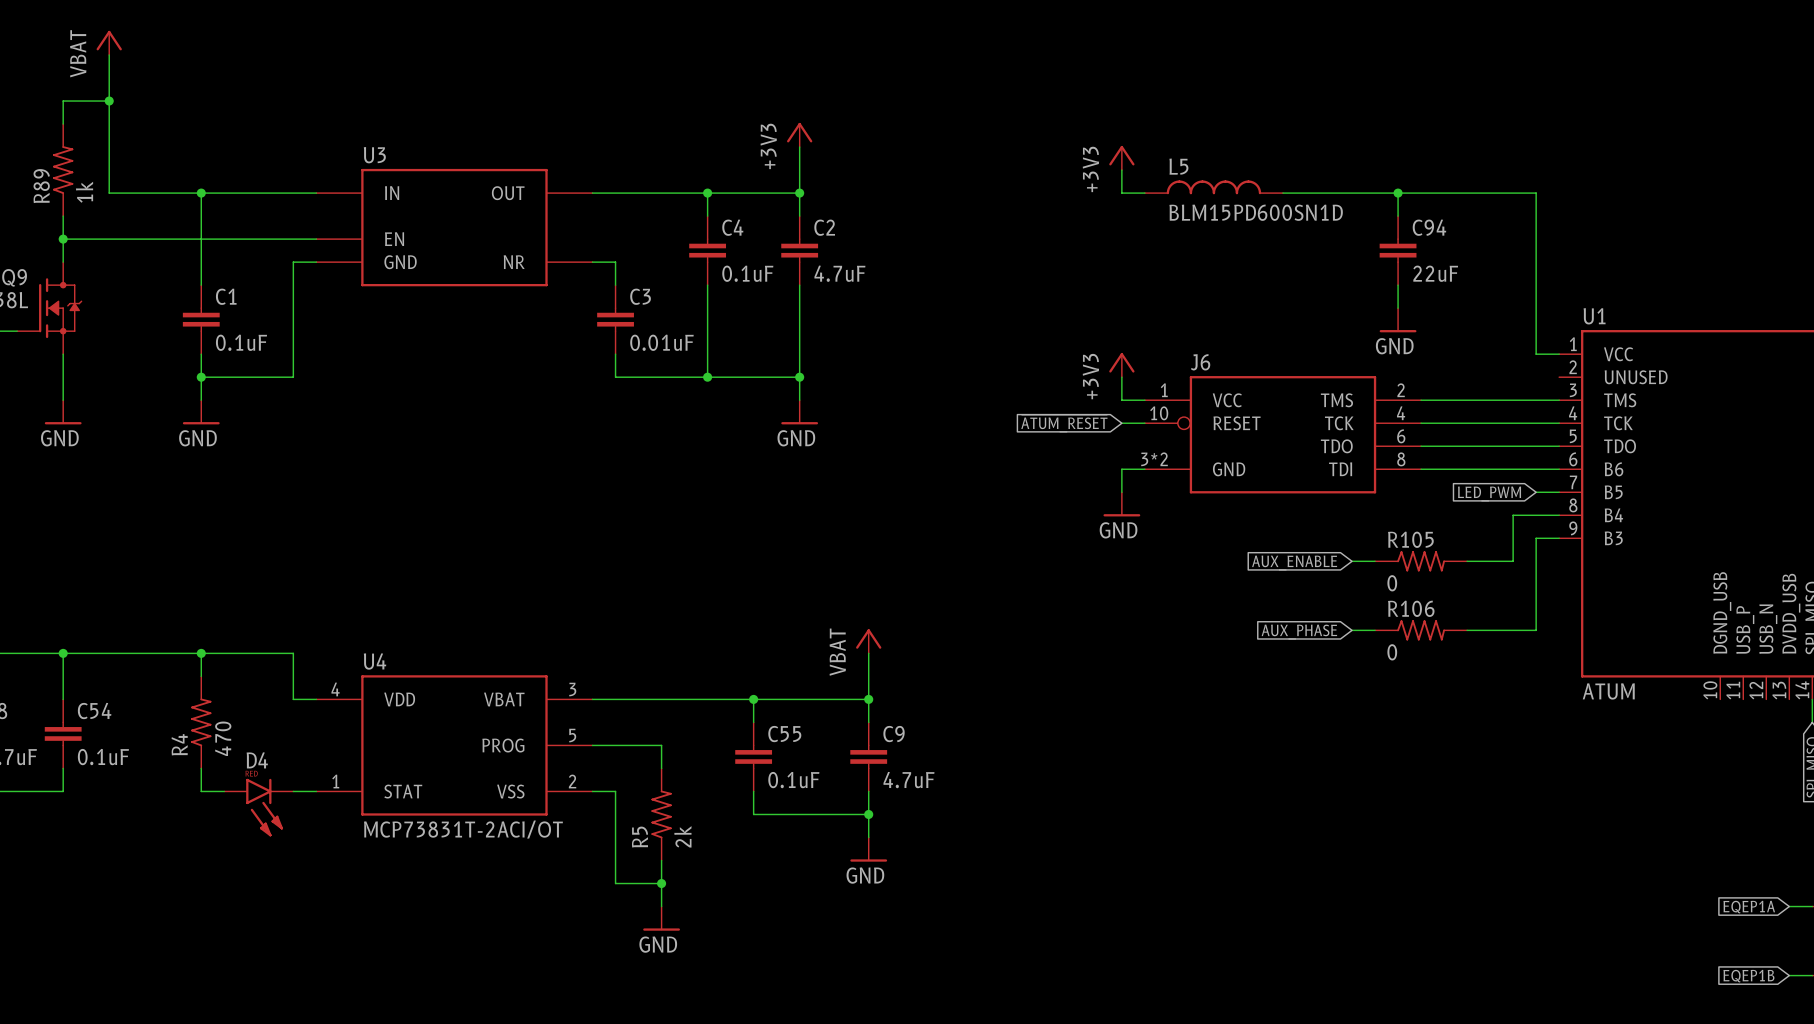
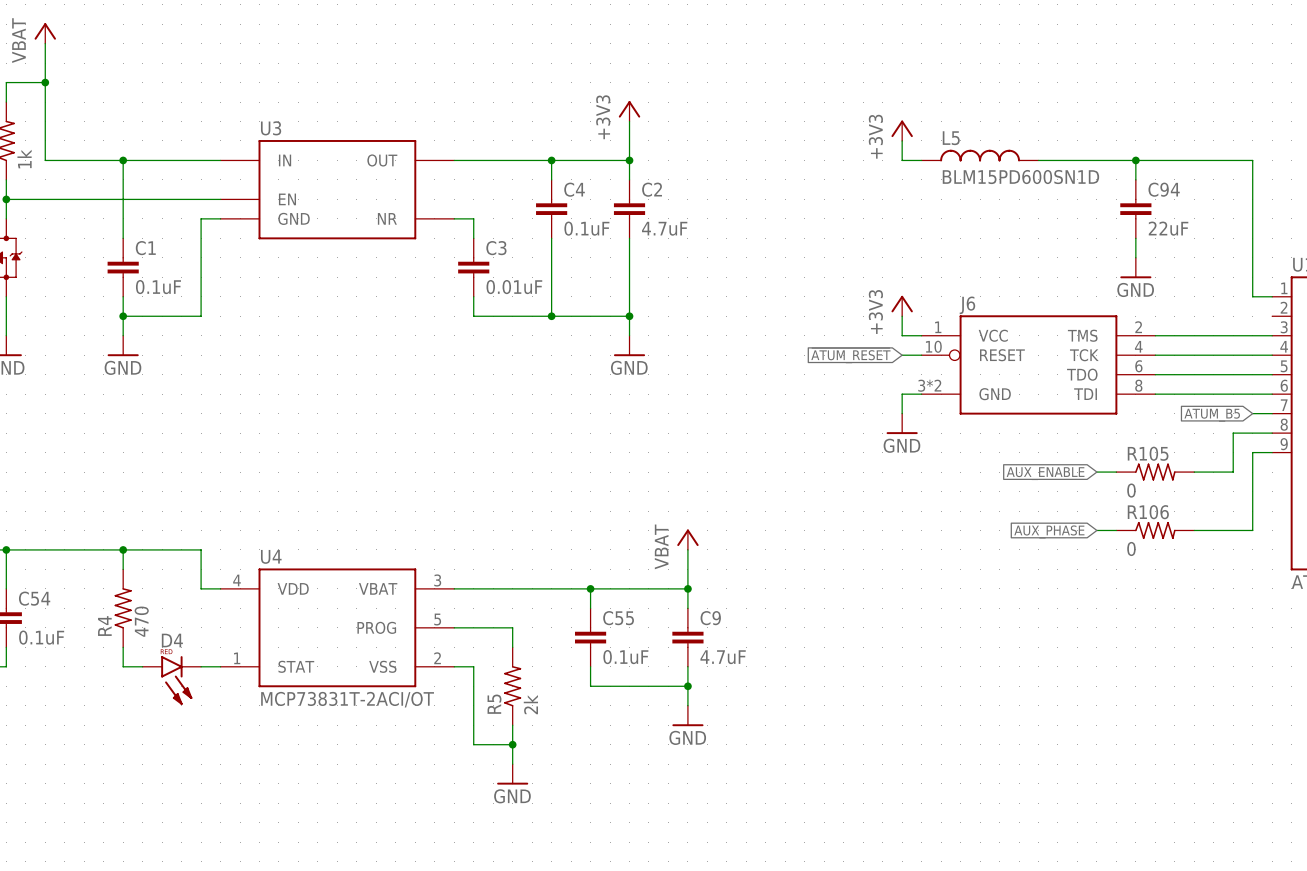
global label: LED_PWM (1489, 493) -> ATUM_B5 (1212, 415)

